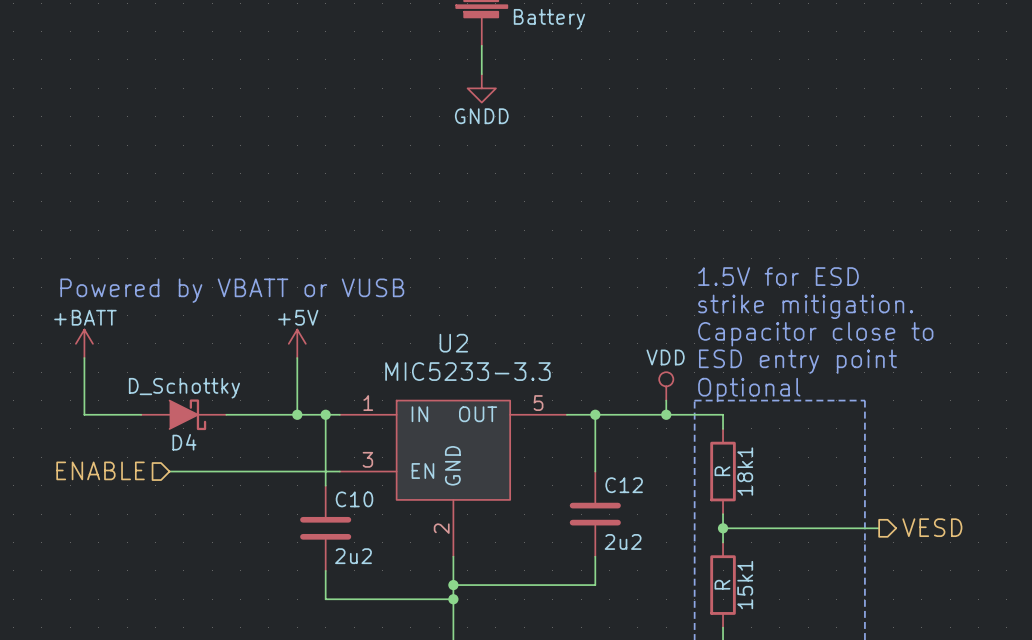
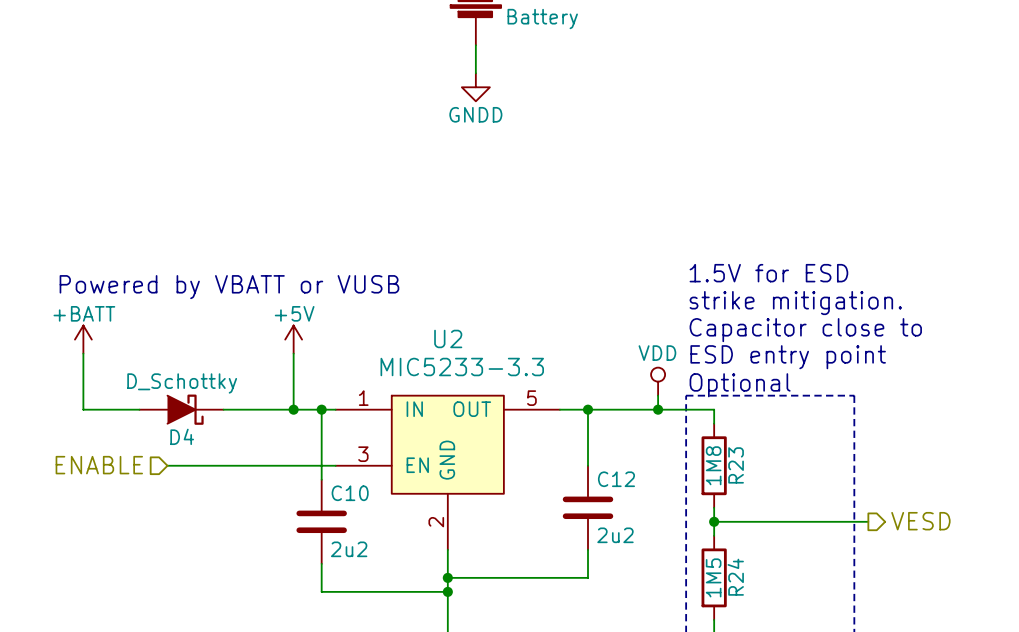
18k1 value: R (722, 471) -> 1M8 (713, 465)
18k1 name: 18k1 (745, 471) -> R23 (736, 465)
15k1 value: R (722, 584) -> 1M5 (713, 577)
15k1 name: 15k1 (745, 585) -> R24 (735, 577)

